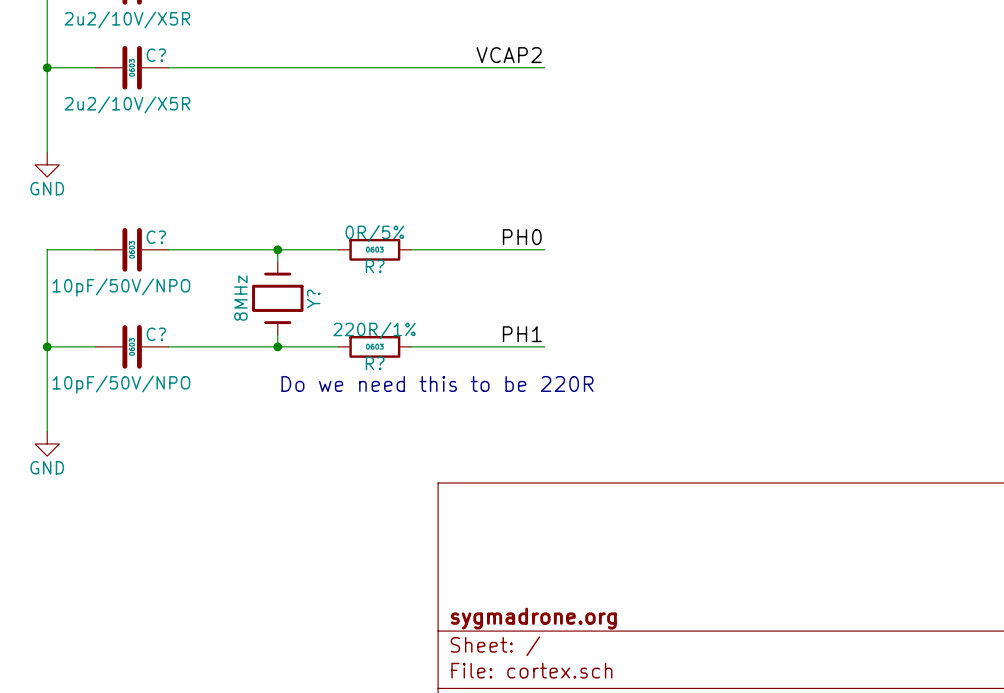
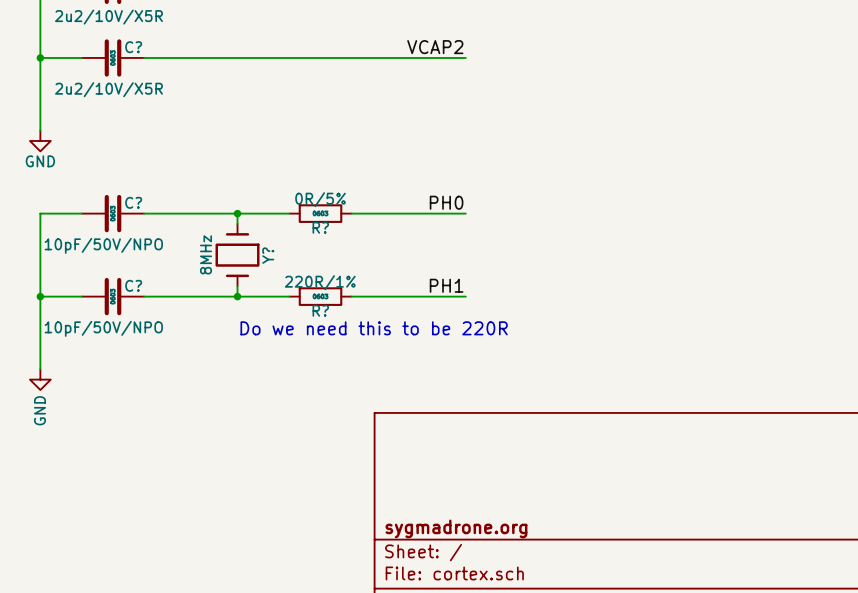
power symbol text rotation: 0° (47, 467) -> 90° counterclockwise (39, 410)

